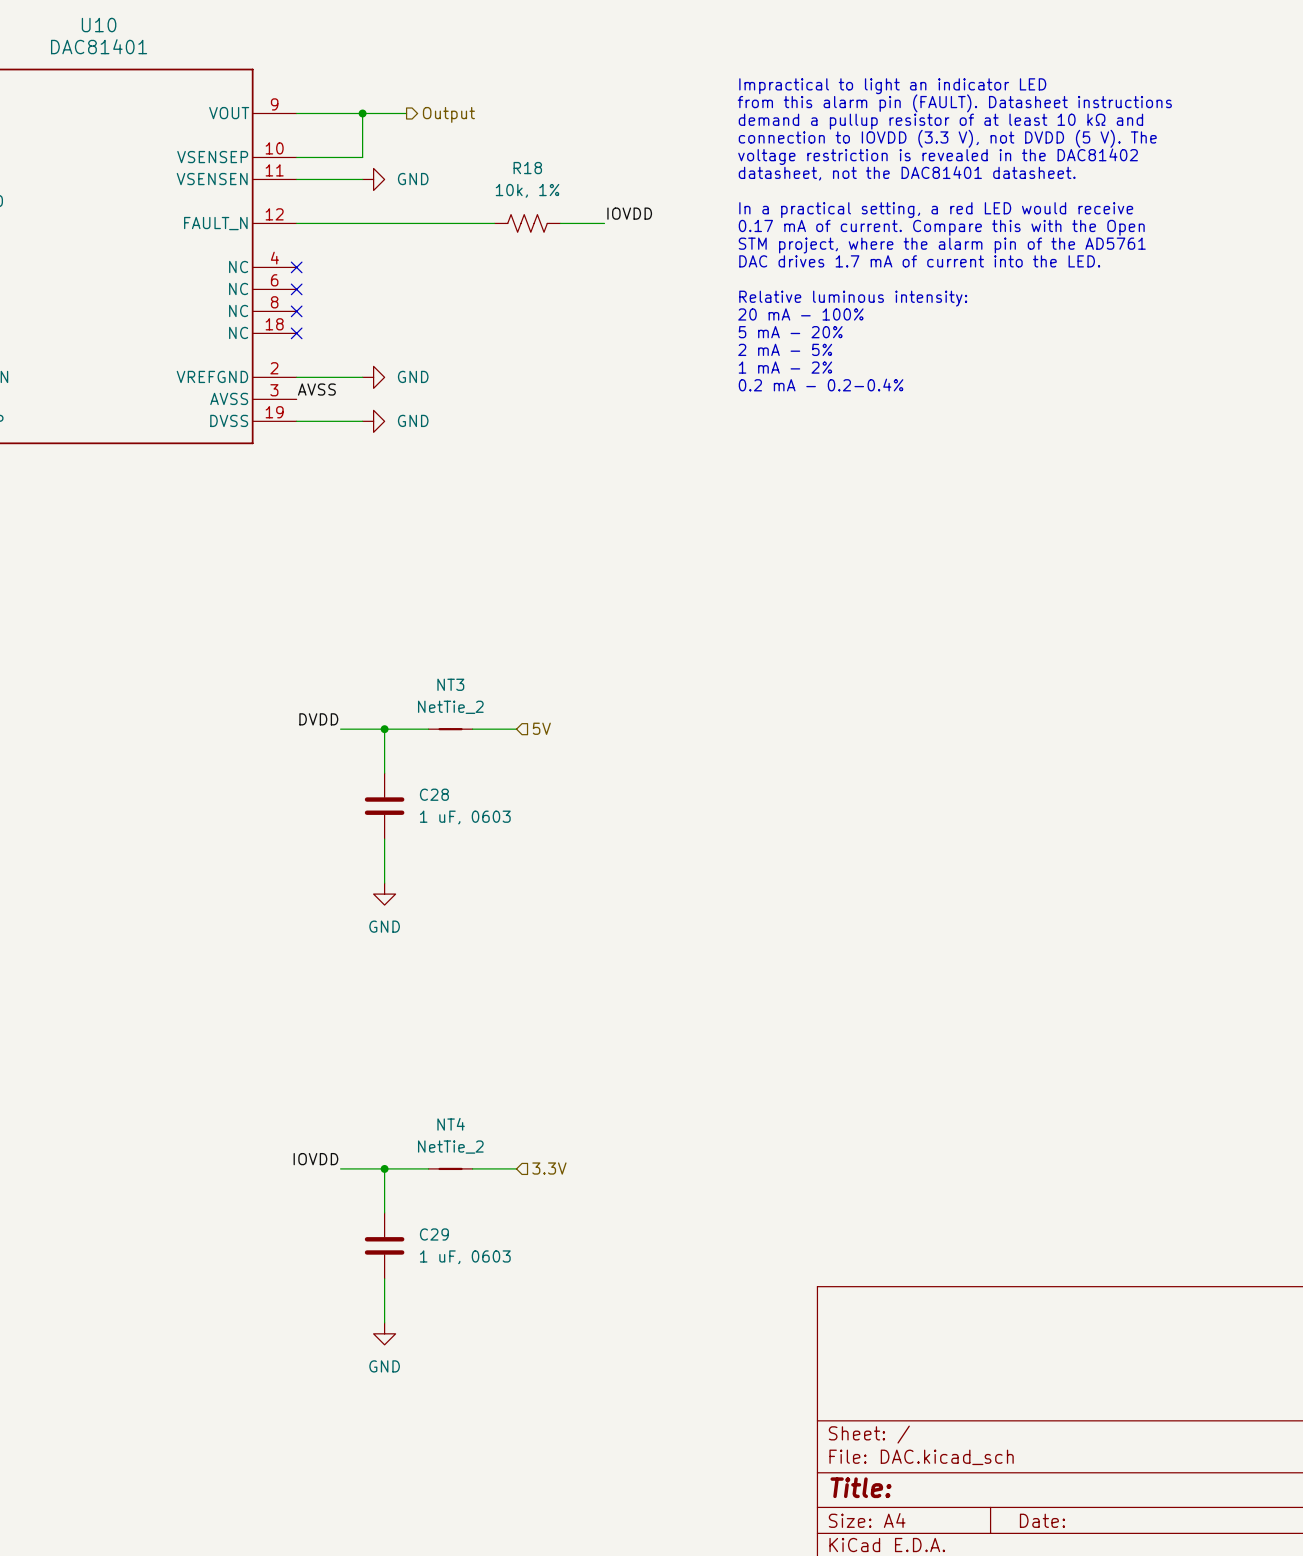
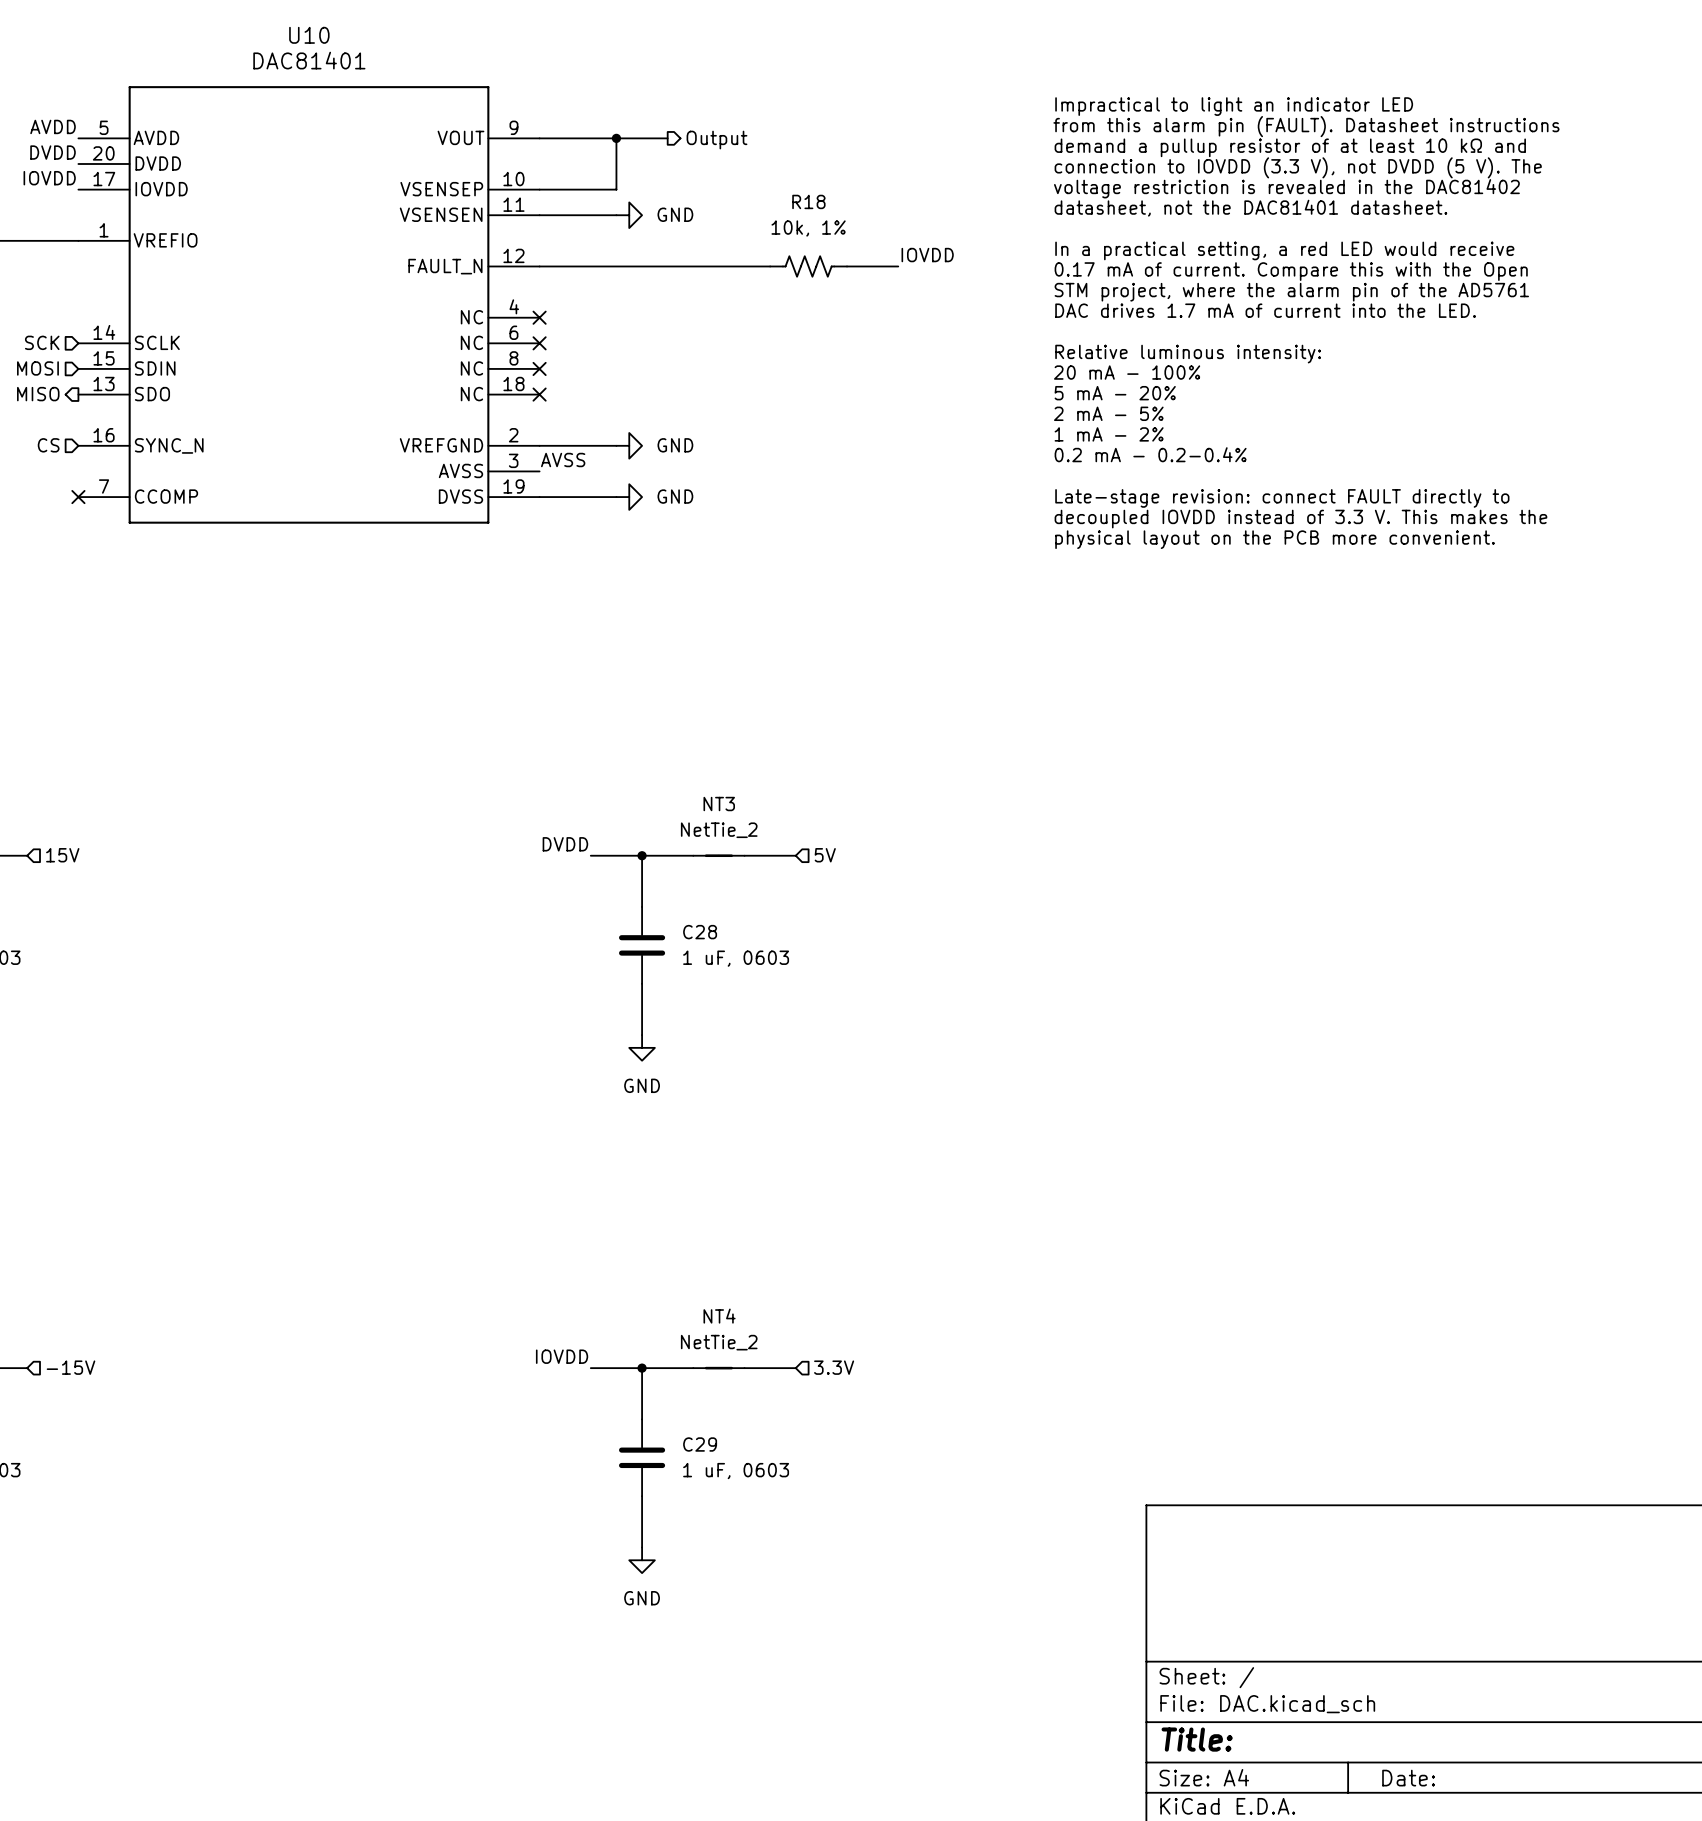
text: none -> Late-stage revision: connect FAULT directly to (1282, 498)
text: none -> decoupled IOVDD instead of 3.3 V. This makes the (1300, 519)
text: none -> physical layout on the PCB more convenient. (1275, 539)

